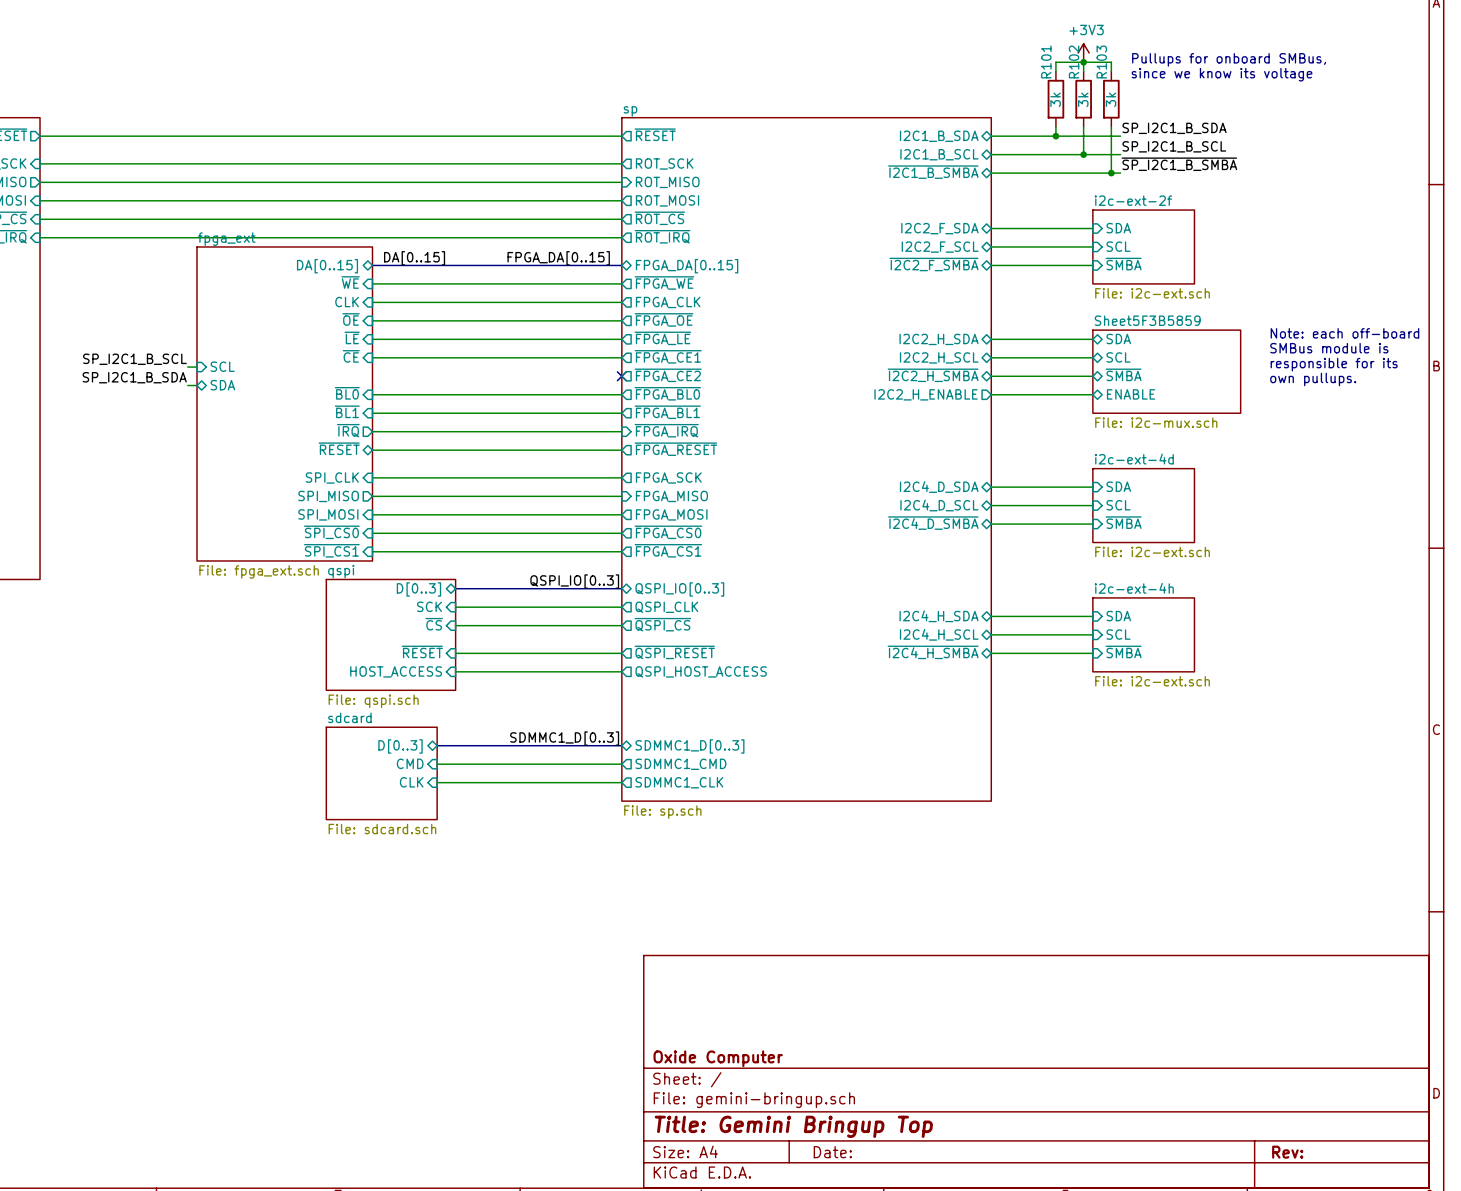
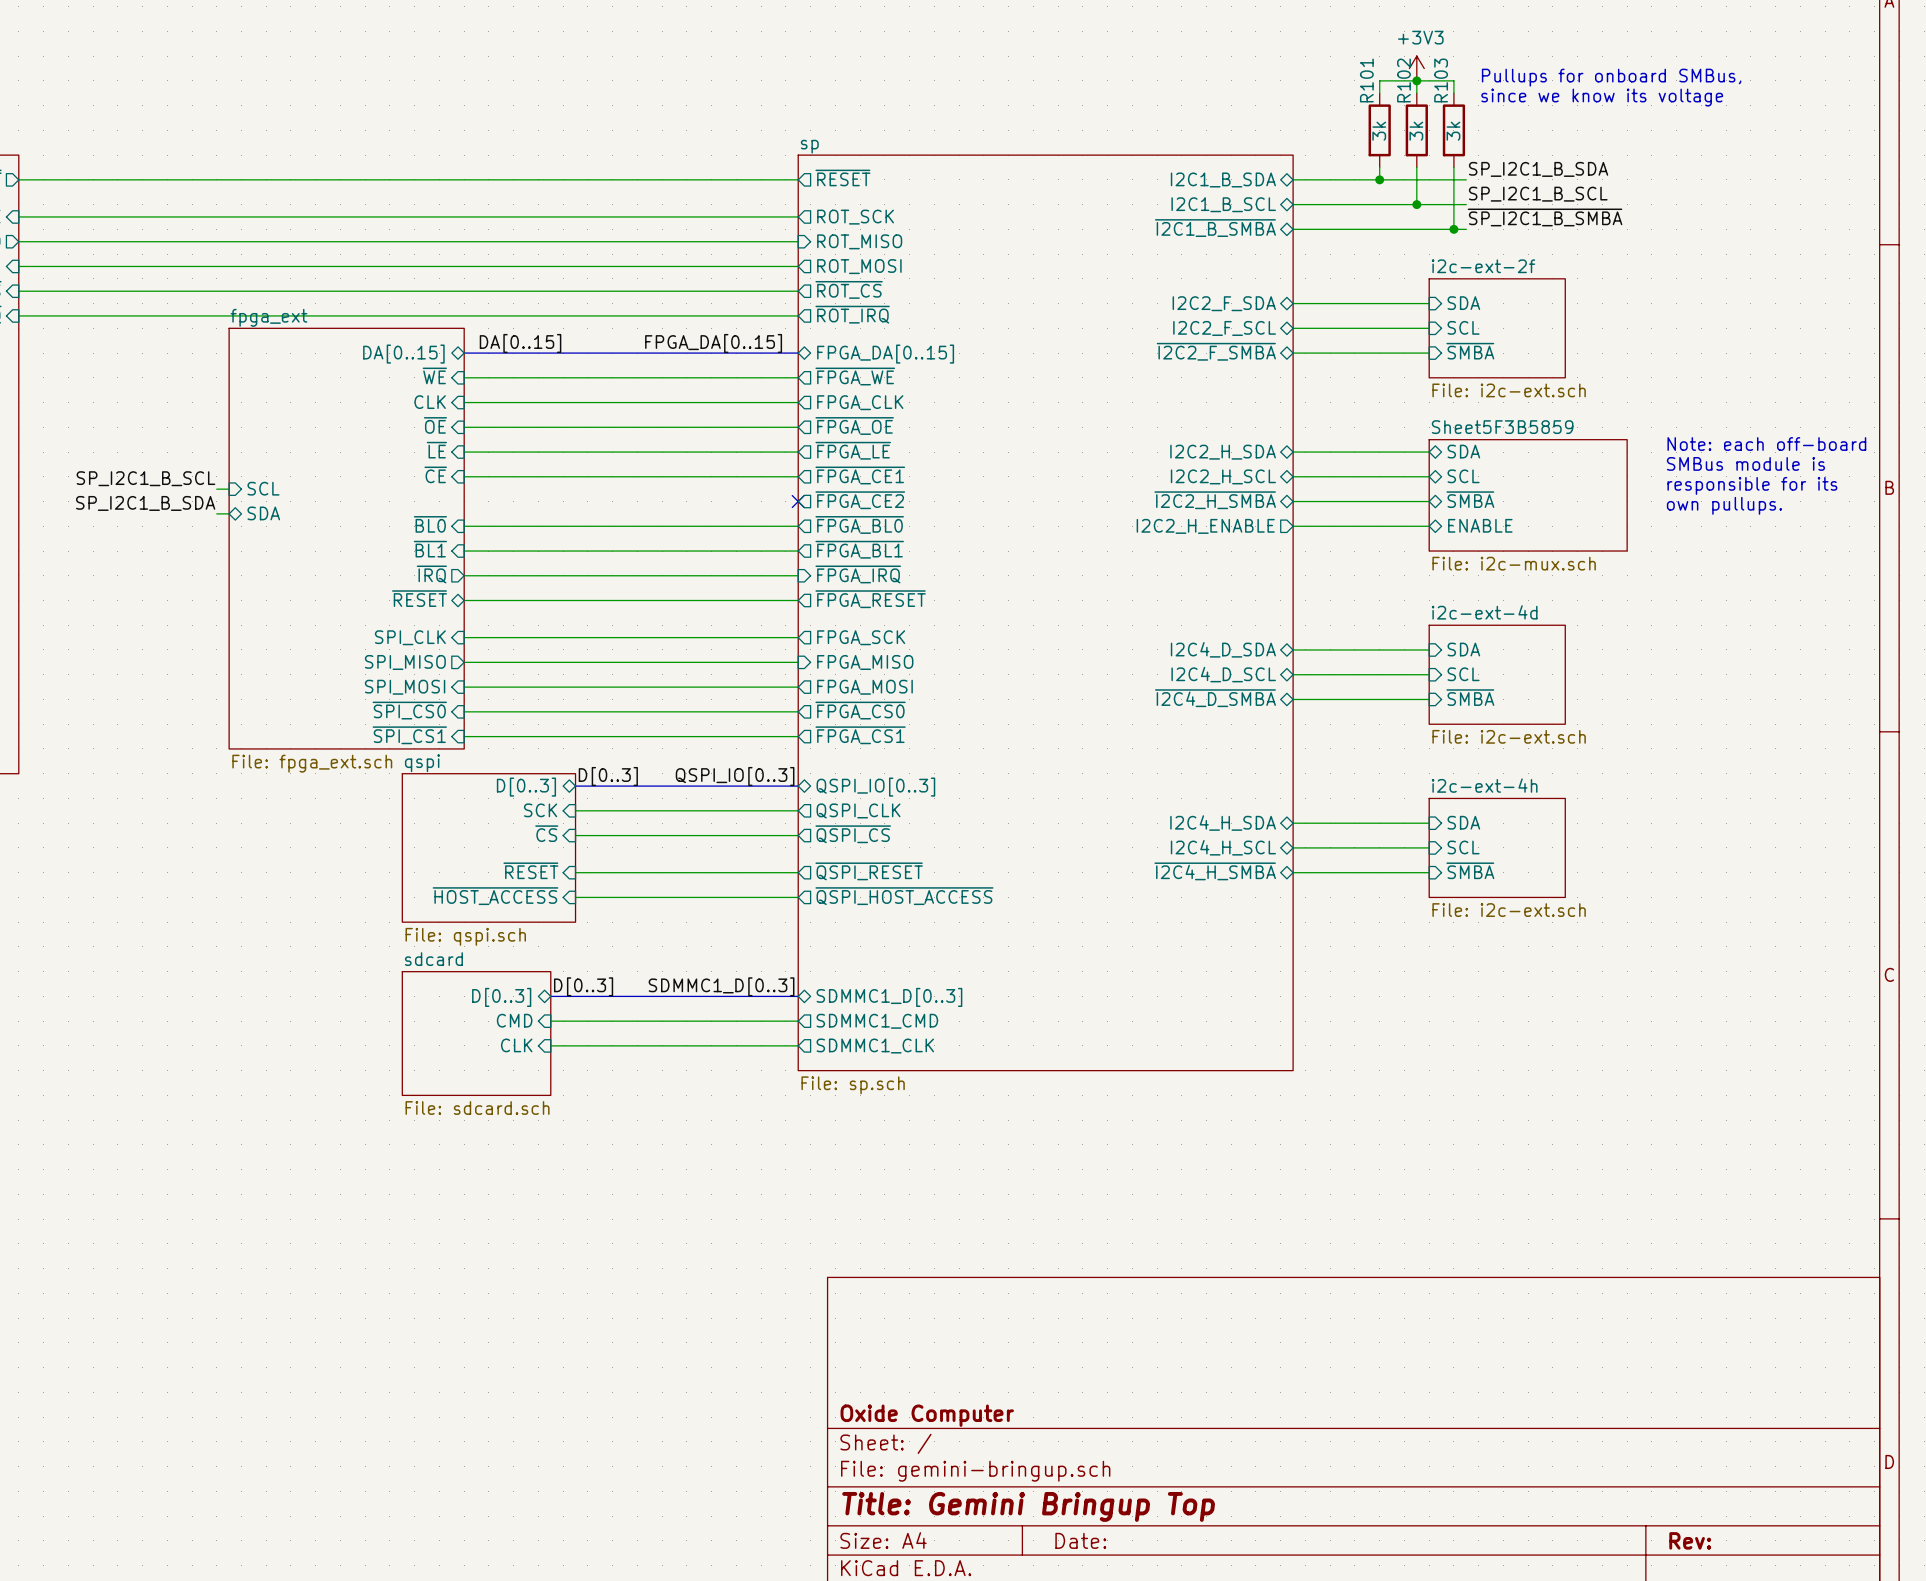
label: none -> D[0..3] (608, 776)
sheet pin: HOST_ACCESS (396, 671) -> ~{HOST_ACCESS} (495, 896)
sheet pin: QSPI_HOST_ACCESS (701, 671) -> ~{QSPI_HOST_ACCESS} (904, 896)
label: none -> D[0..3] (583, 986)

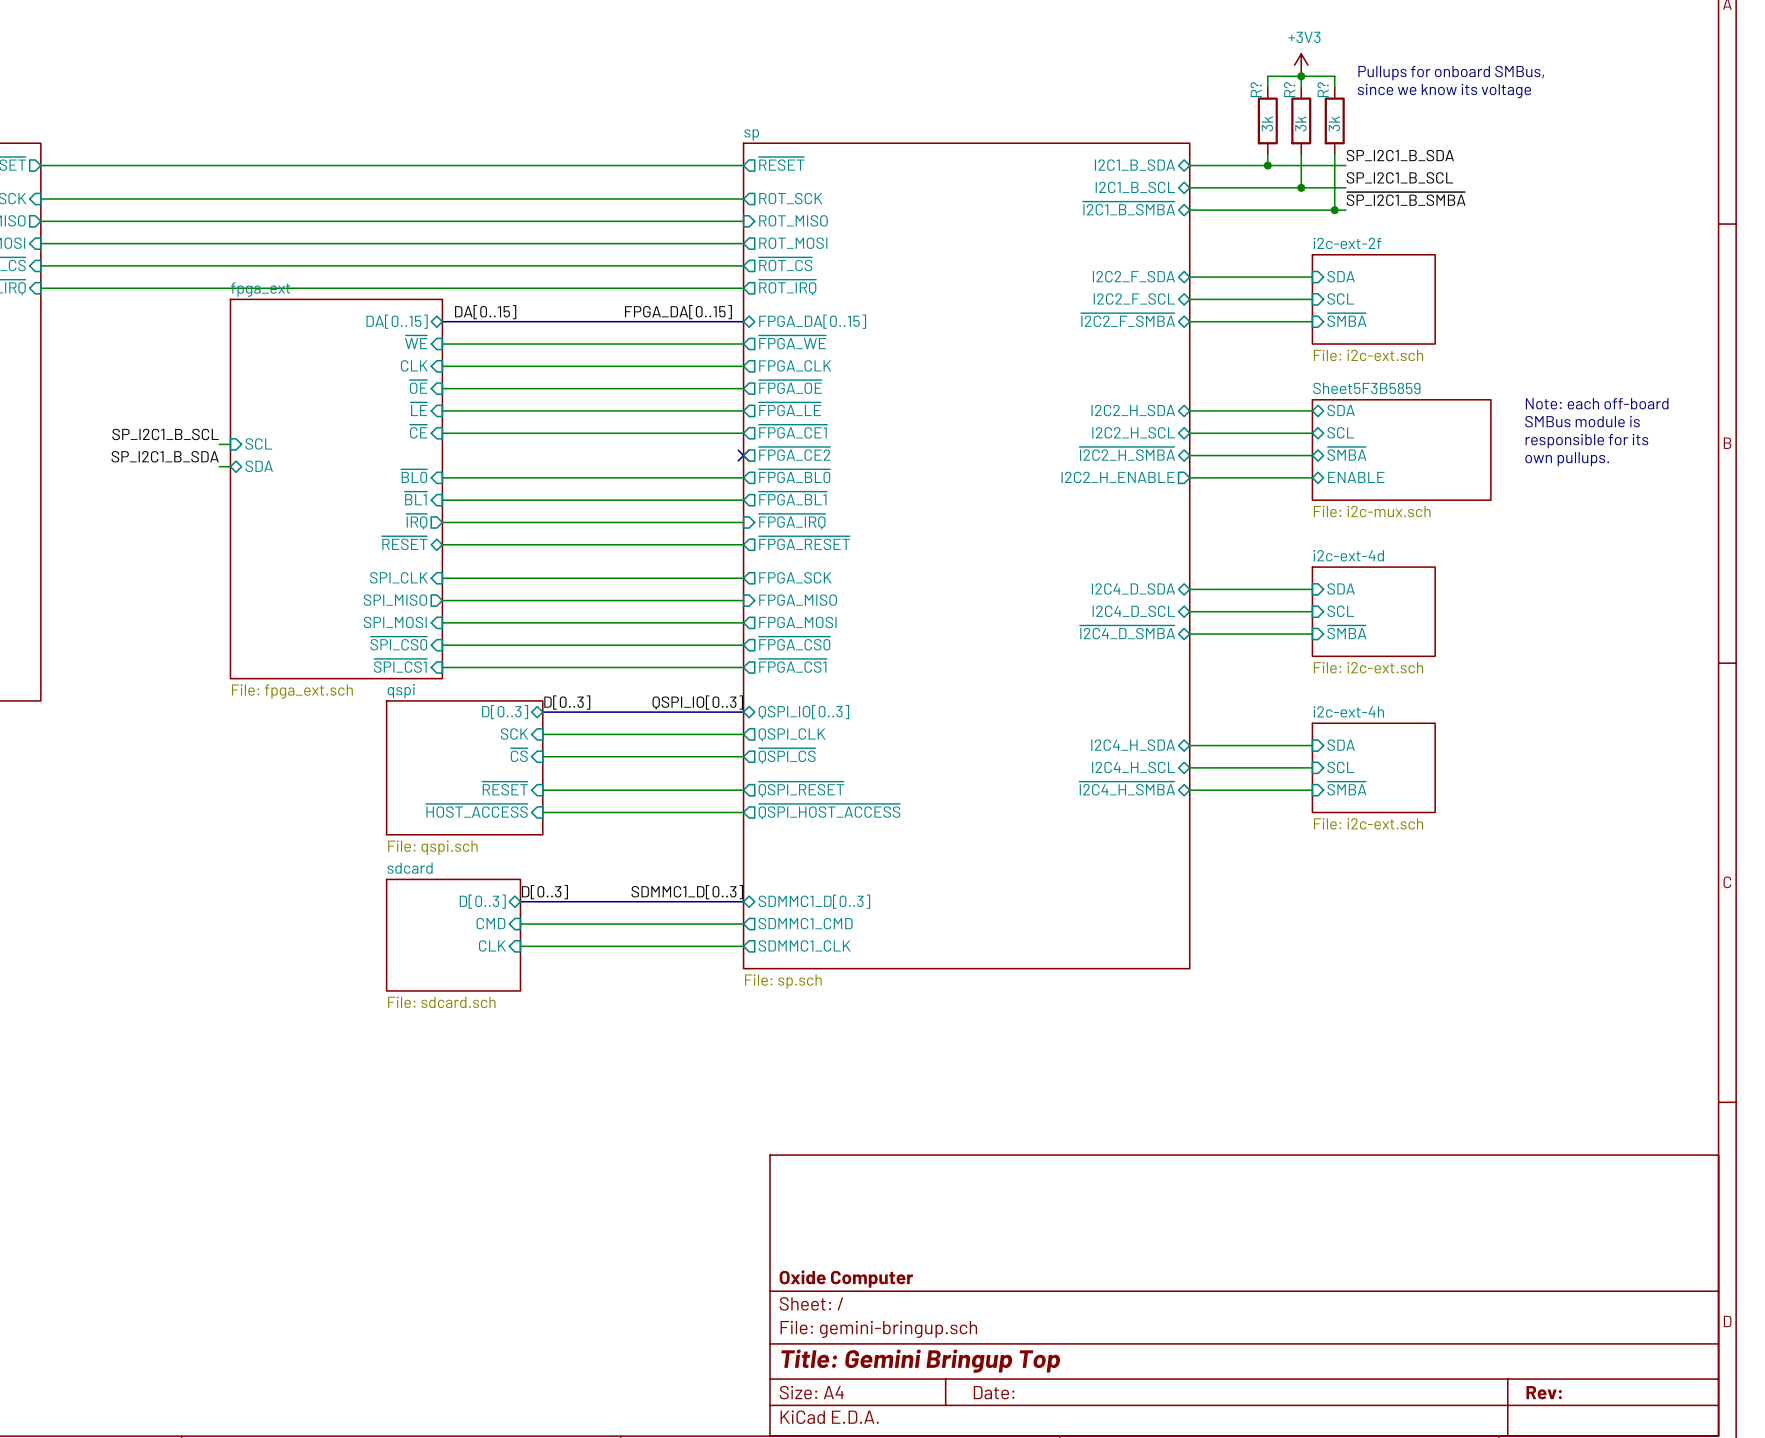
R101 name: R101 (1366, 80) -> R? (1256, 89)
R102 name: R102 (1403, 80) -> R? (1289, 89)
R103 name: R103 (1441, 80) -> R? (1323, 89)

